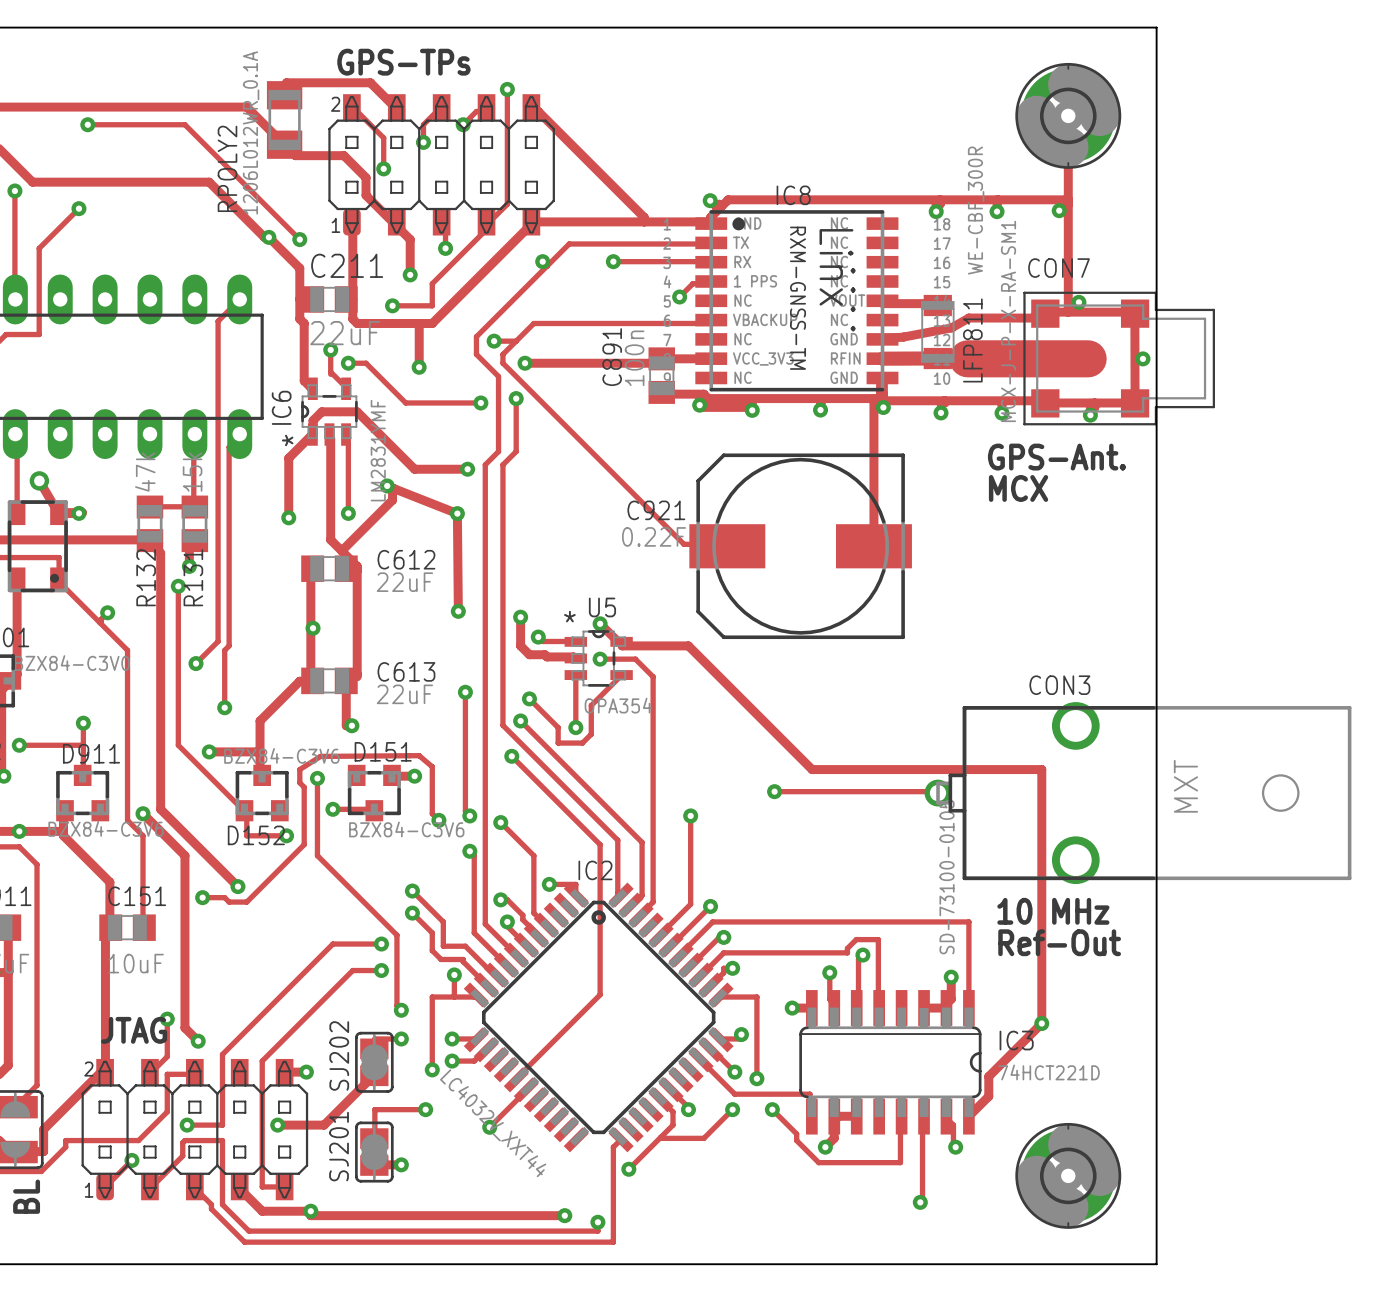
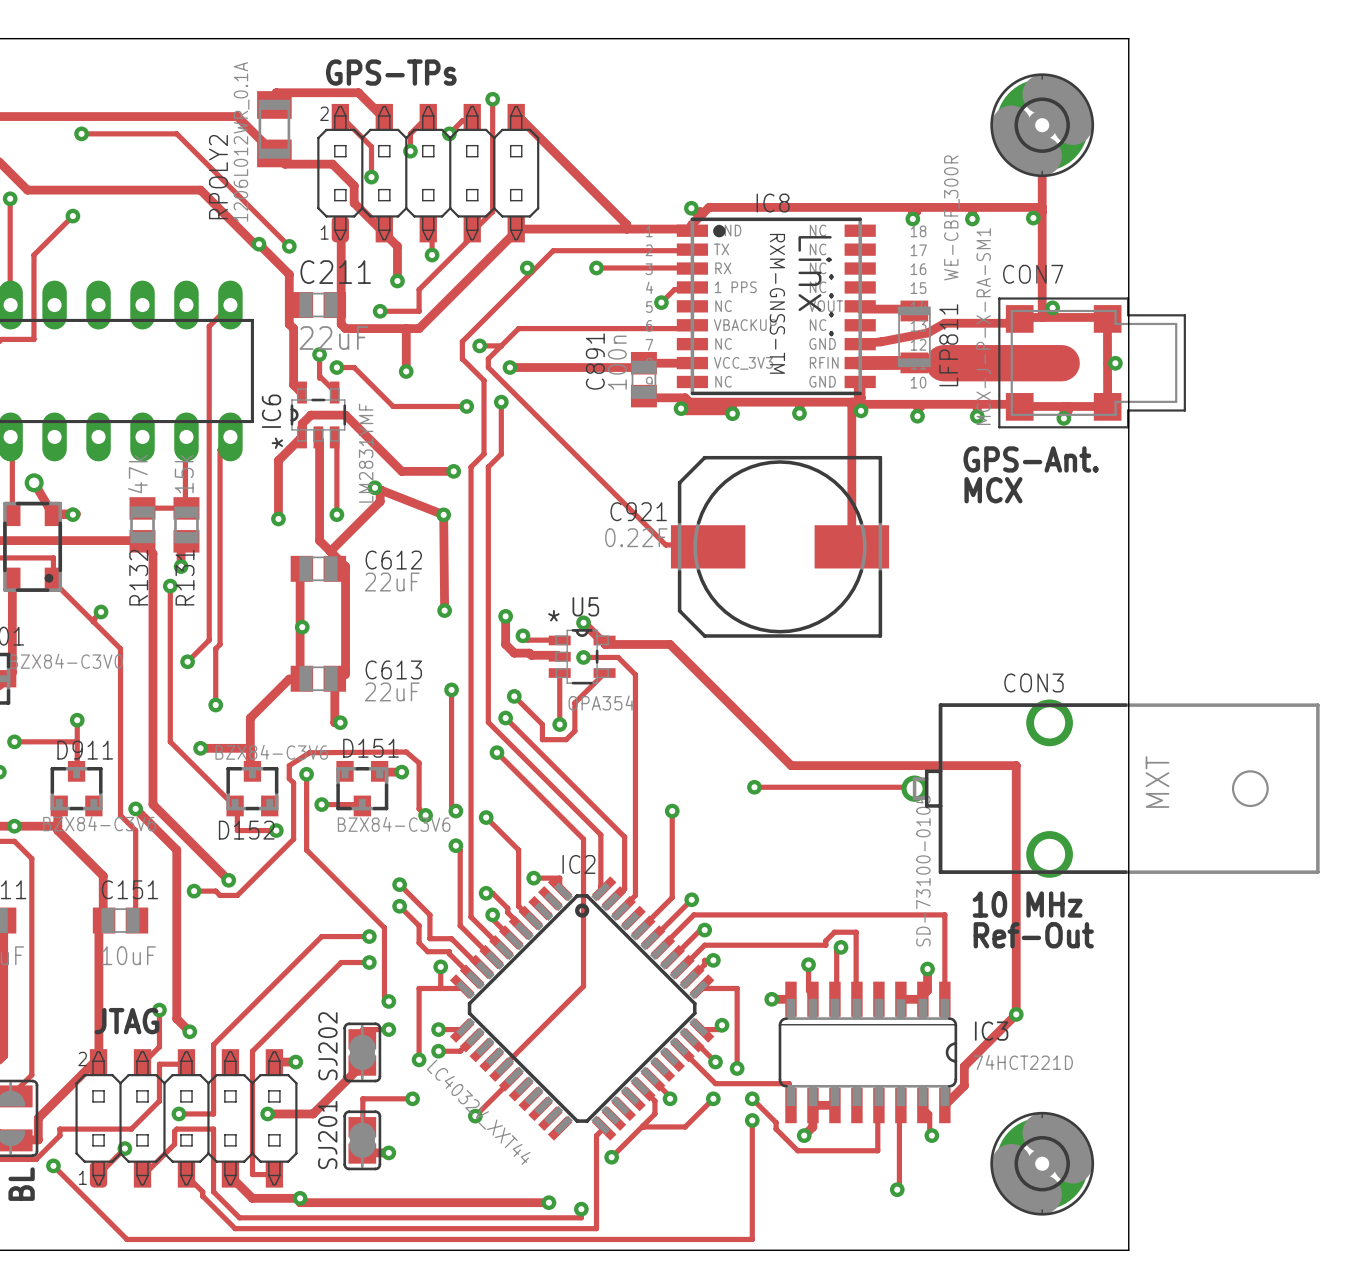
track: none -> (752, 1120) (752, 1239) (127, 1239) (53, 1165)
via: none -> (752, 1120)
via: none -> (53, 1165)

